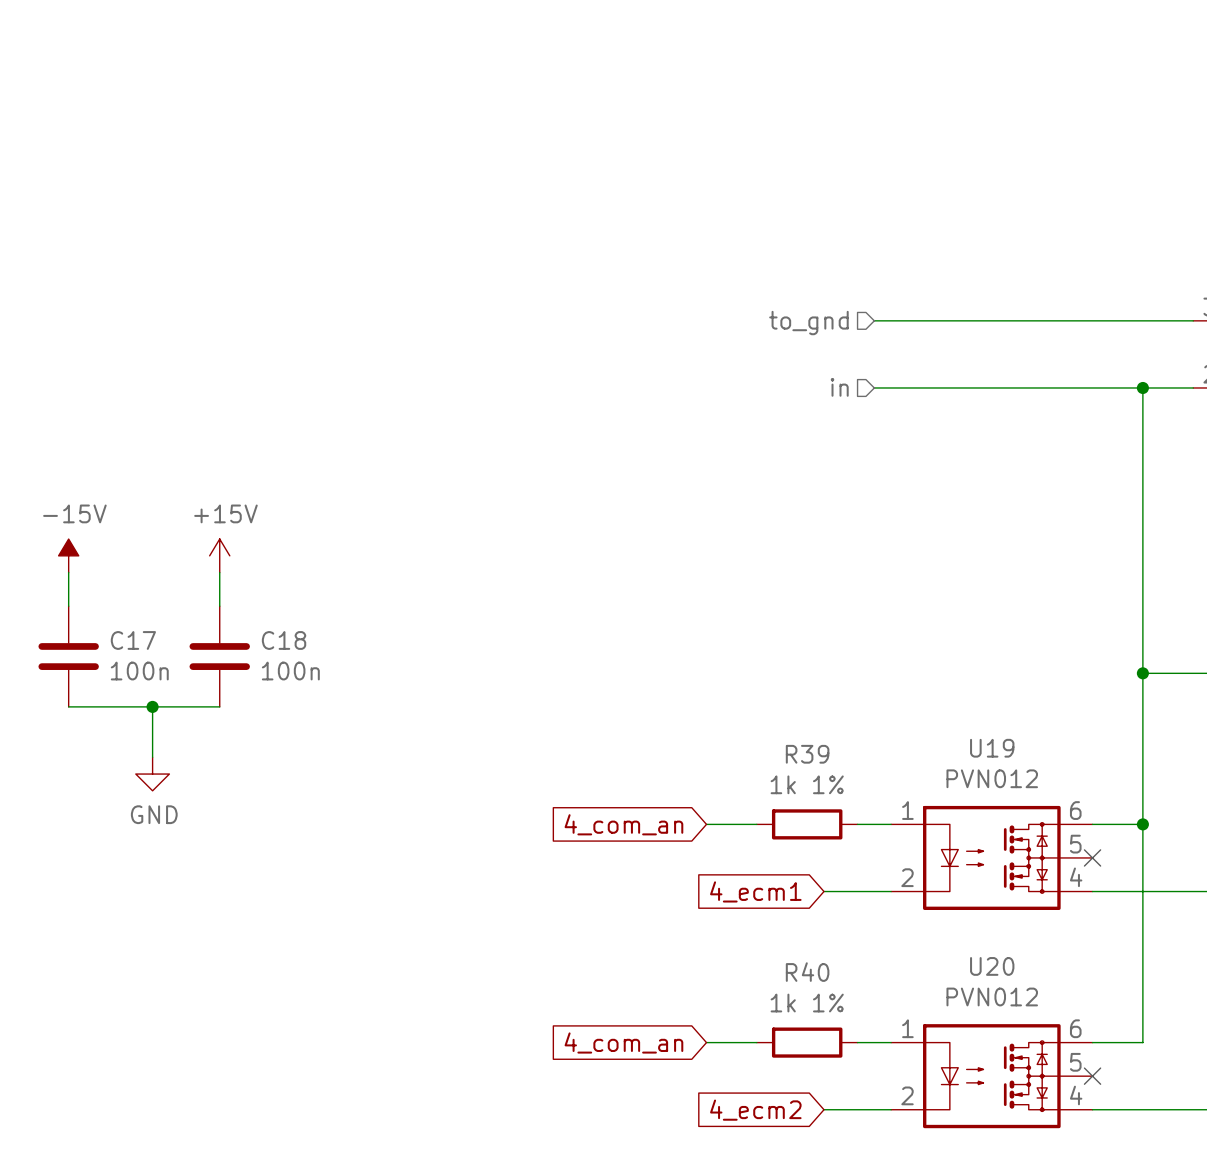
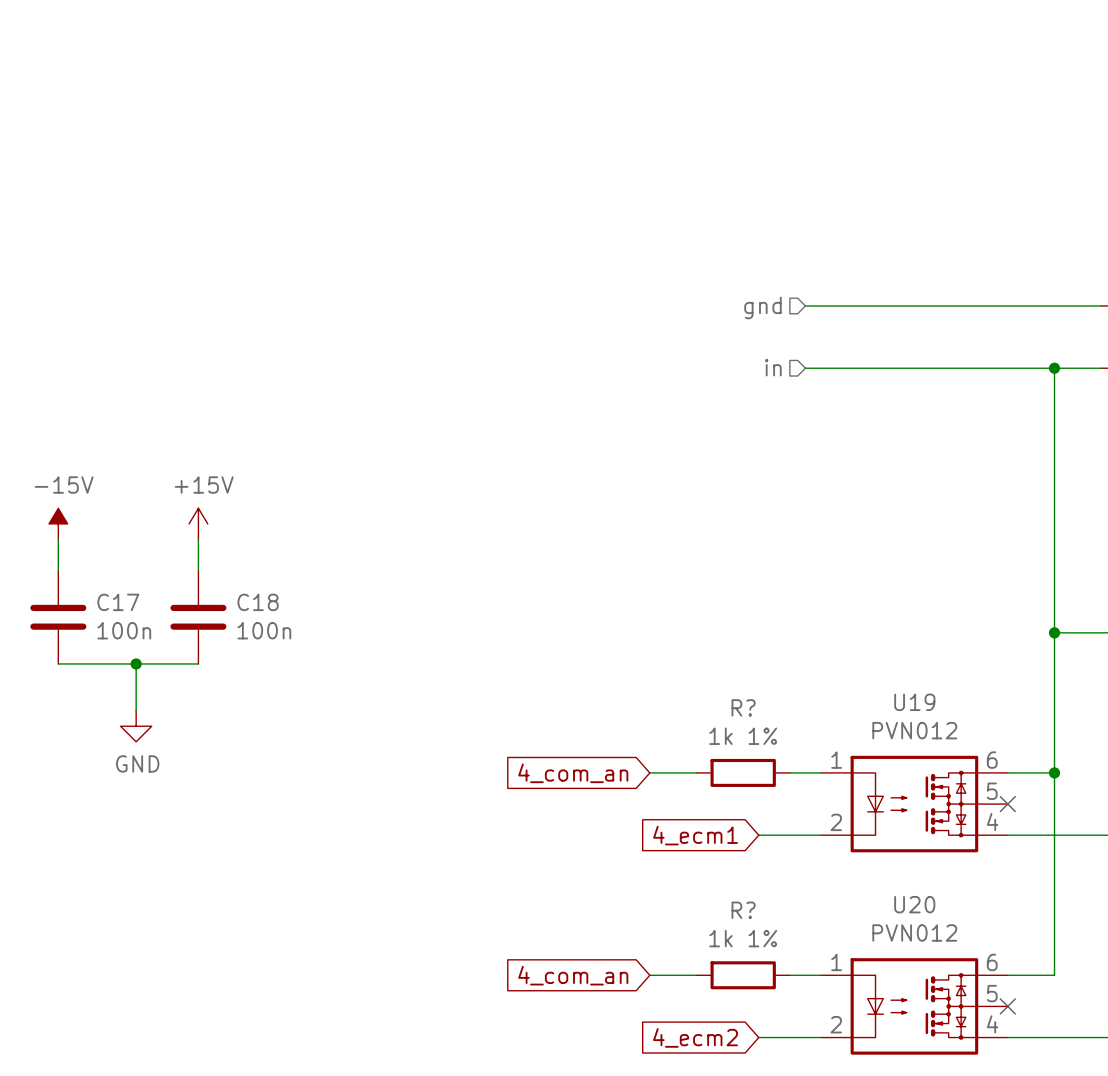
hierarchical label: to_gnd (808, 323) -> gnd (762, 307)
R39 name: R39 (807, 754) -> R? (743, 707)
R40 name: R40 (807, 972) -> R? (743, 910)

